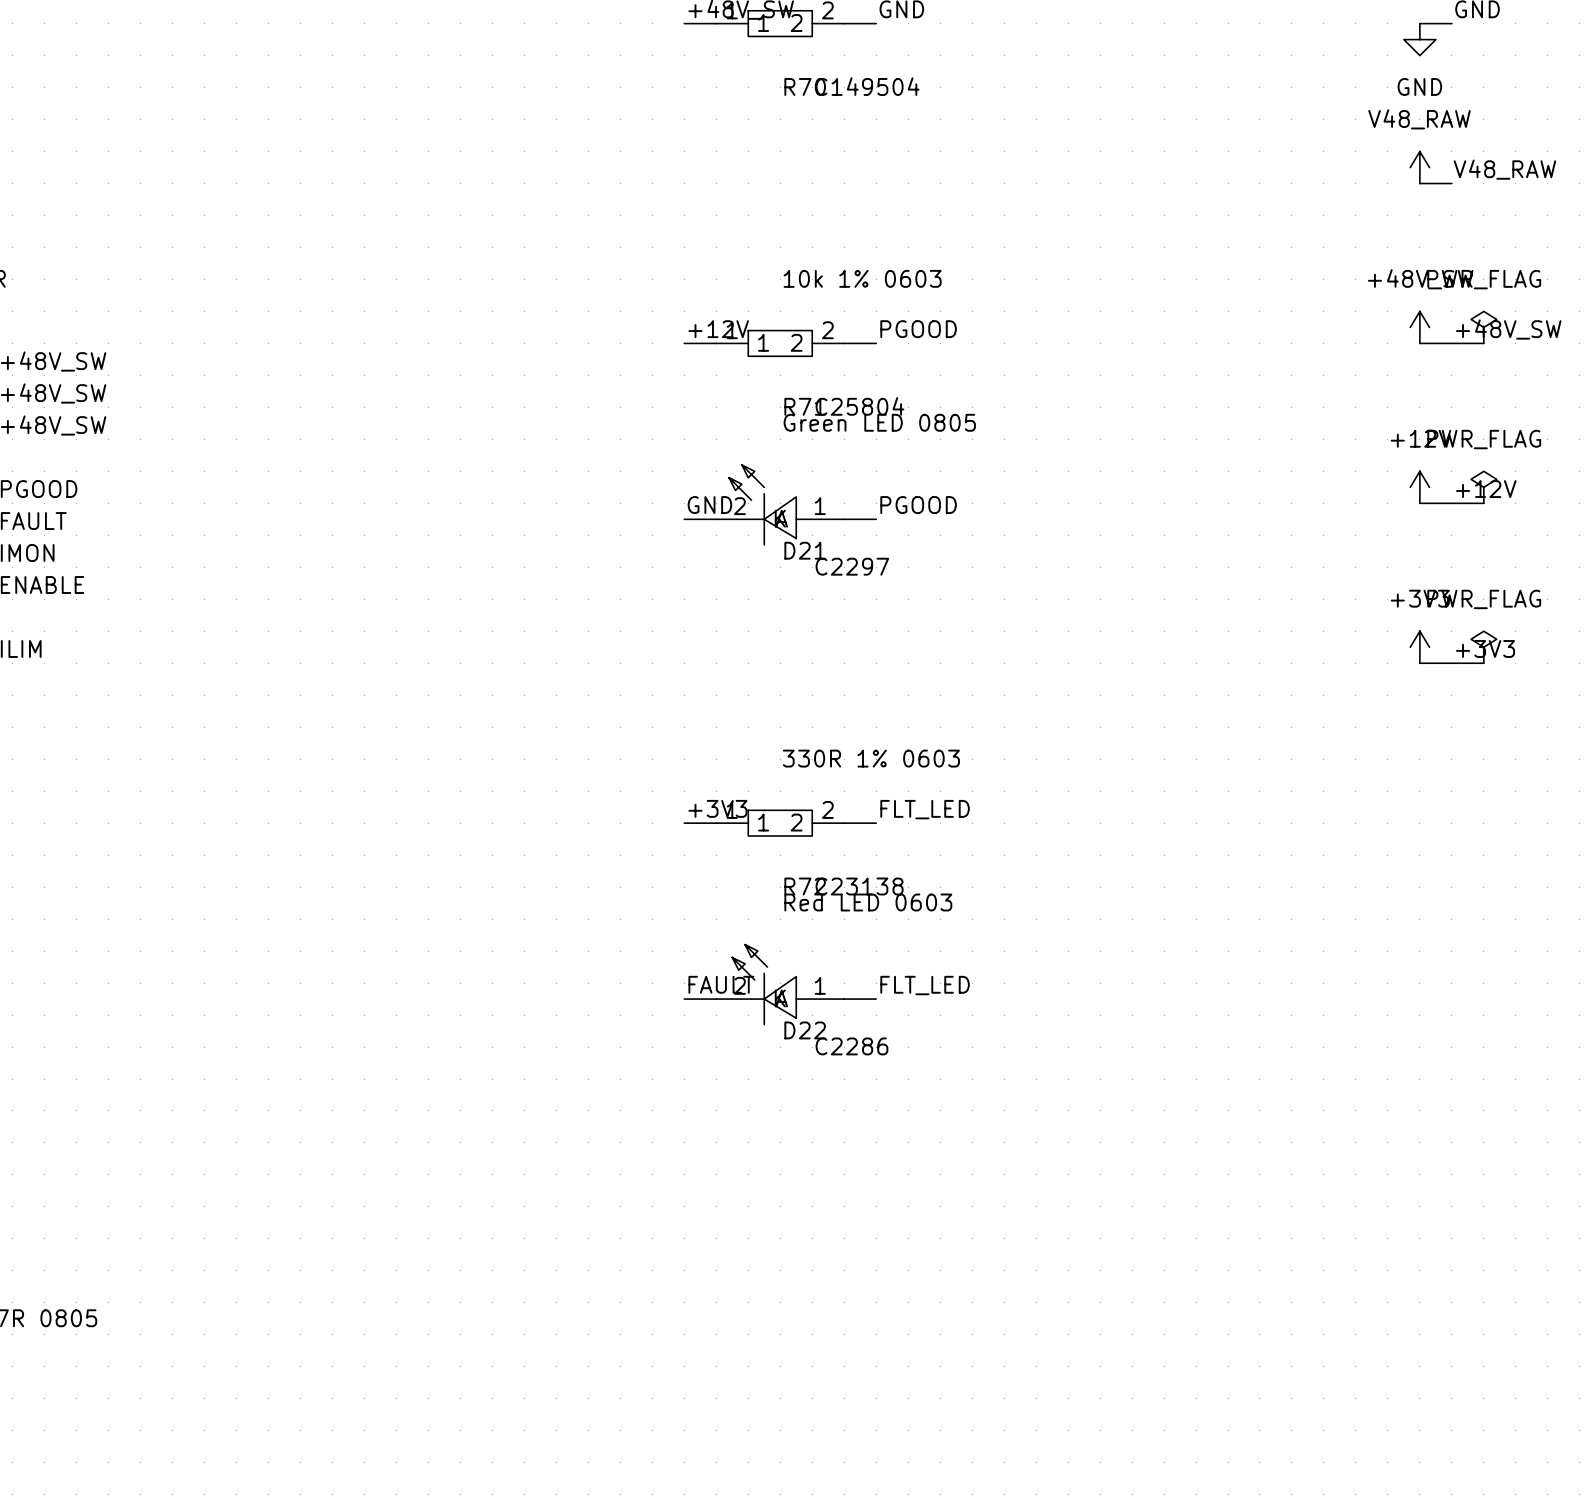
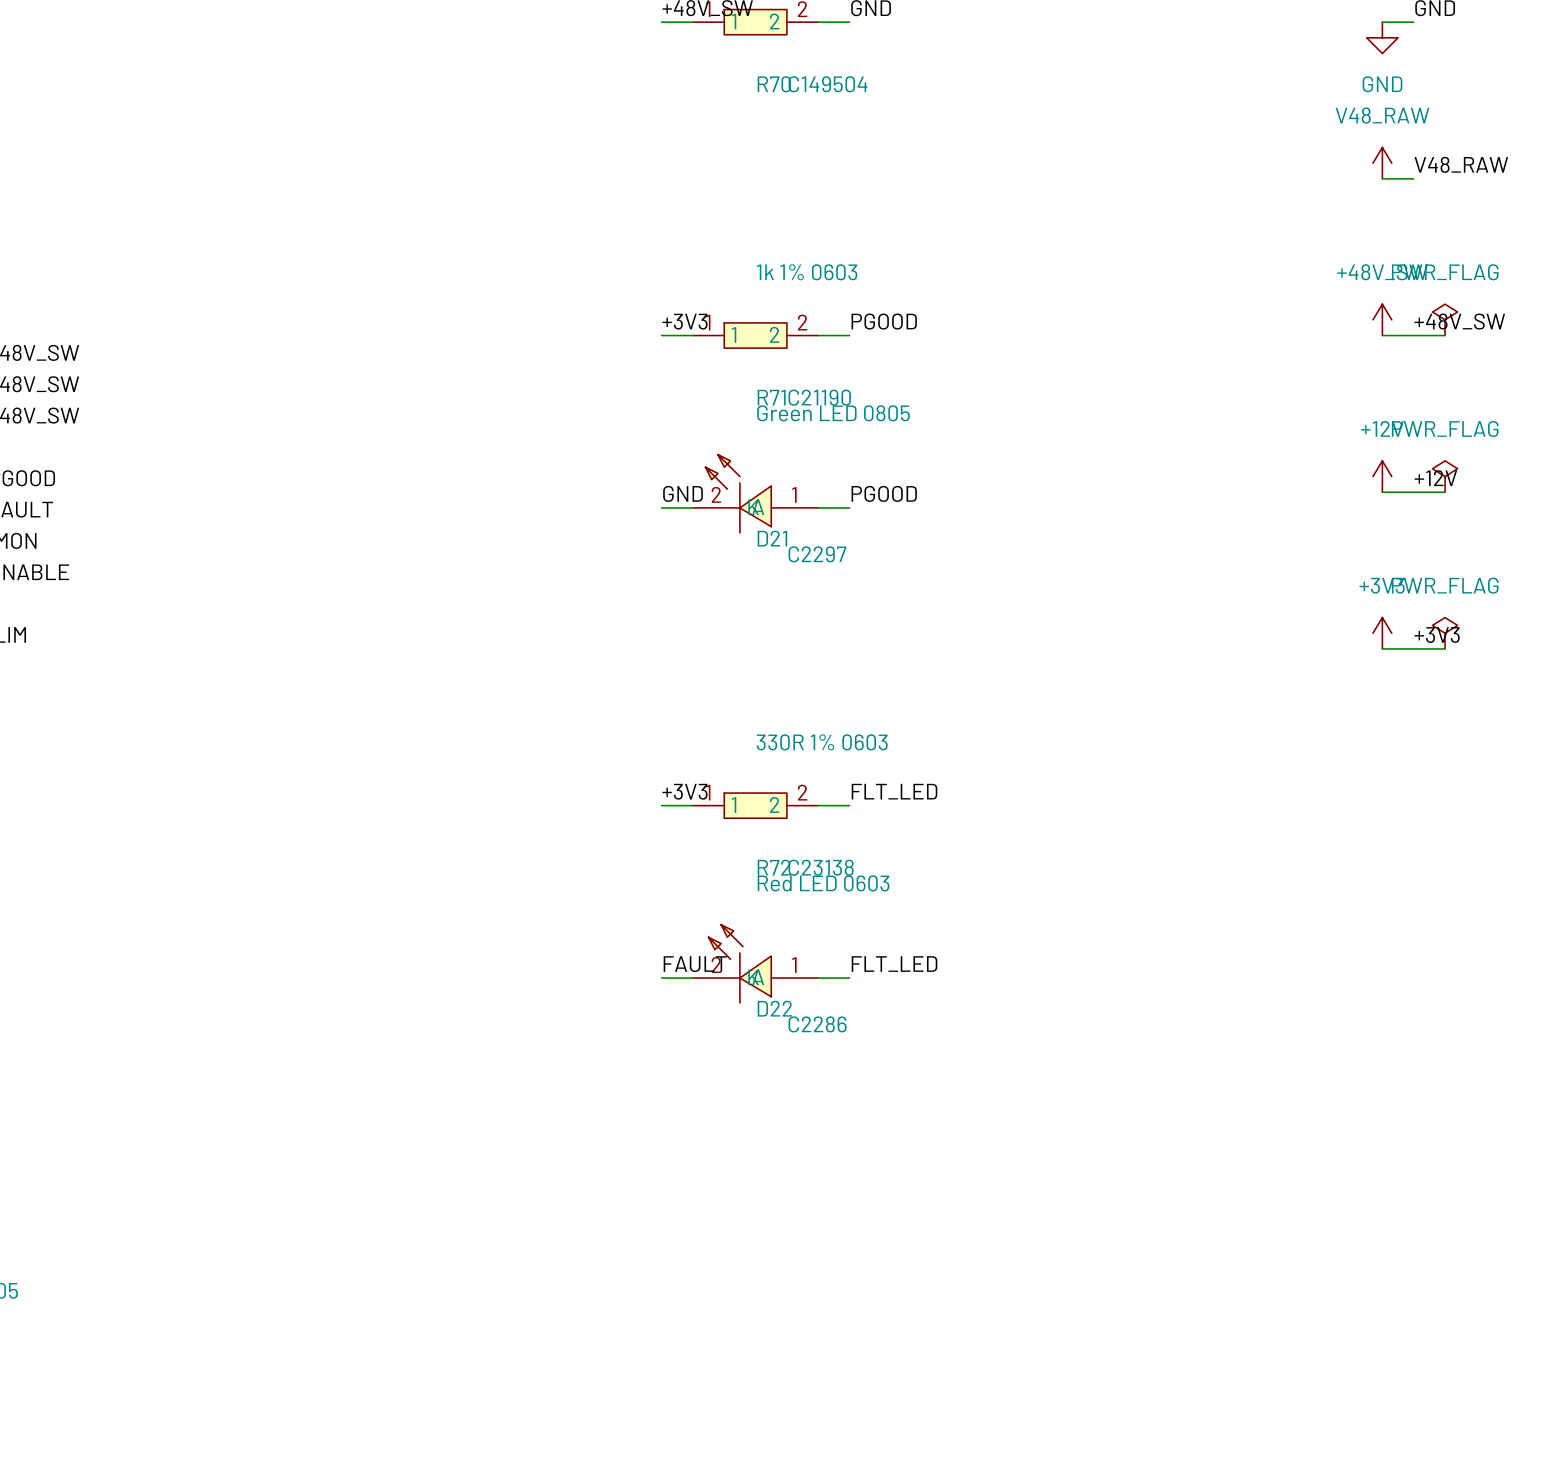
R71 value: 10k 1% 0603 (862, 278) -> 1k 1% 0603 (807, 272)
label: +12V (718, 329) -> +3V3 (684, 321)
R71 text: C25804 (859, 406) -> C21190 (819, 397)

